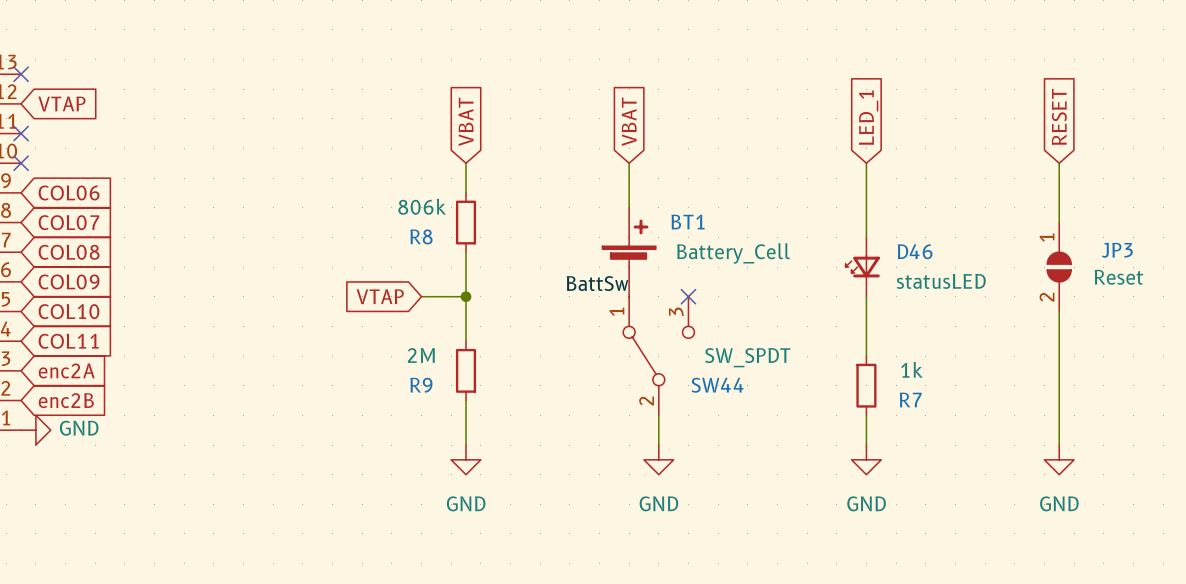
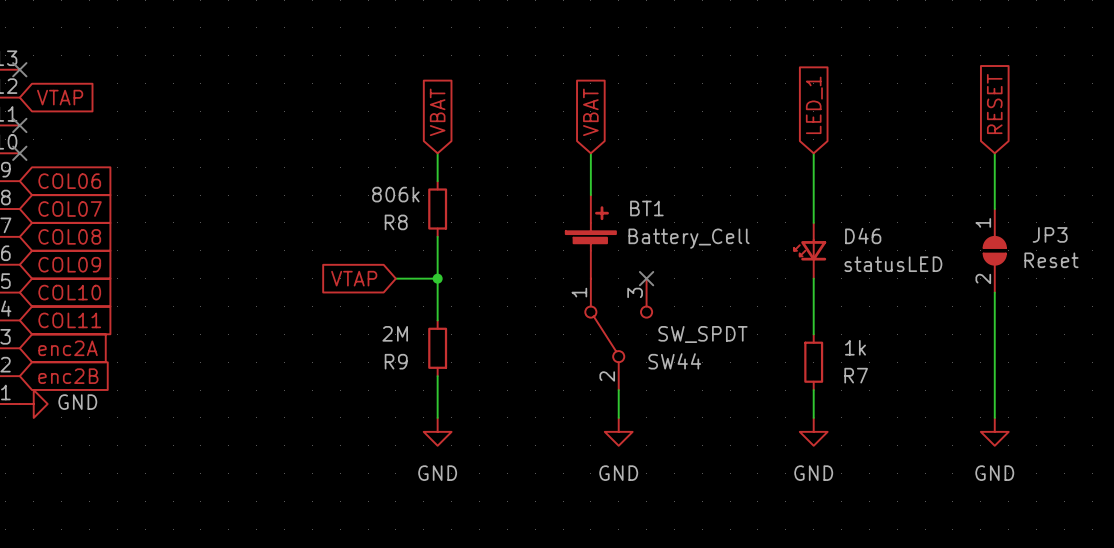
label: BattSw (597, 283) -> none

